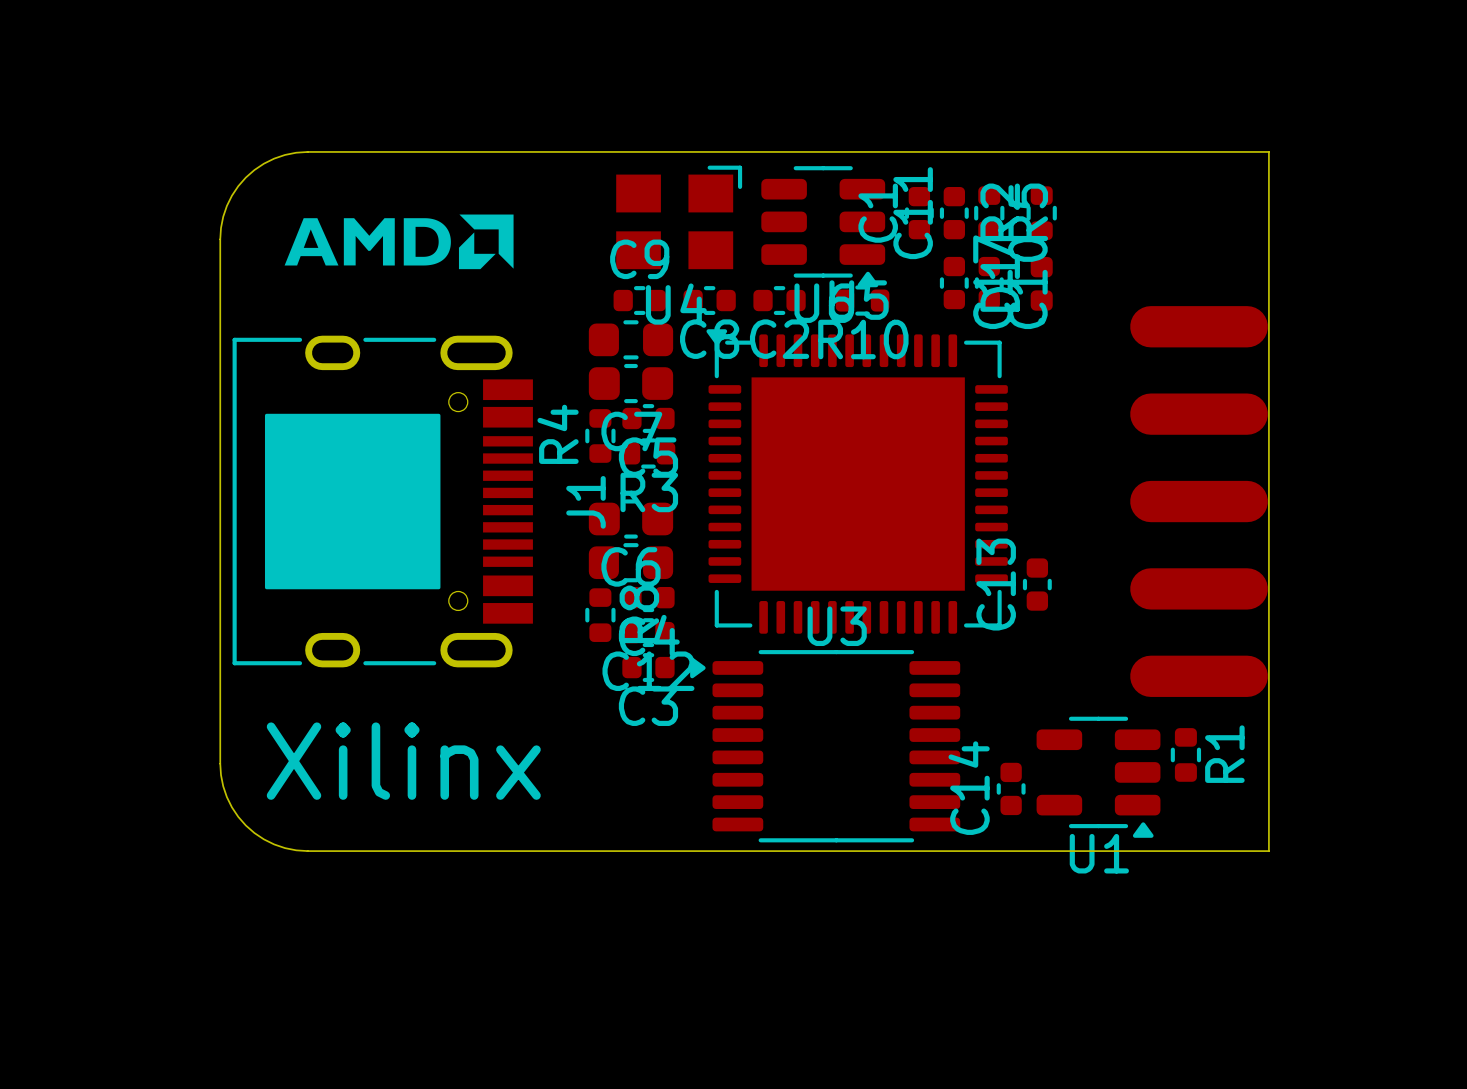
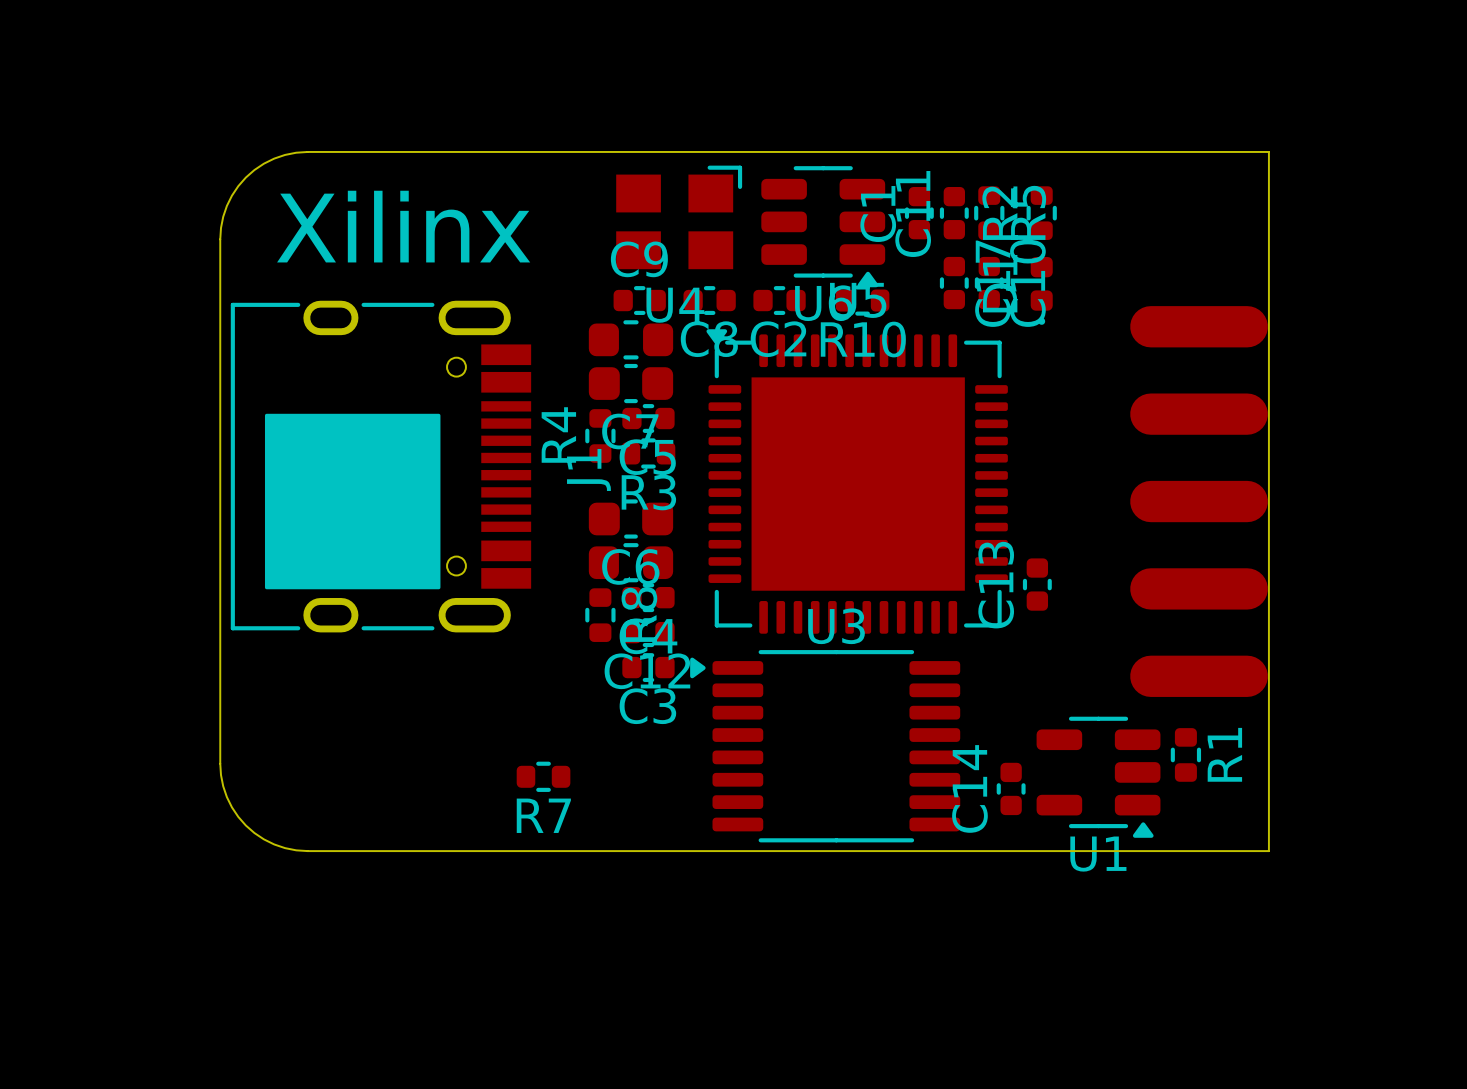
drawing: [284, 214, 514, 270] -> none
J1 position: (382, 501) -> (380, 466)
text position: Xilinx (403, 761) -> Xilinx (403, 226)
R7: none -> (543, 776)

